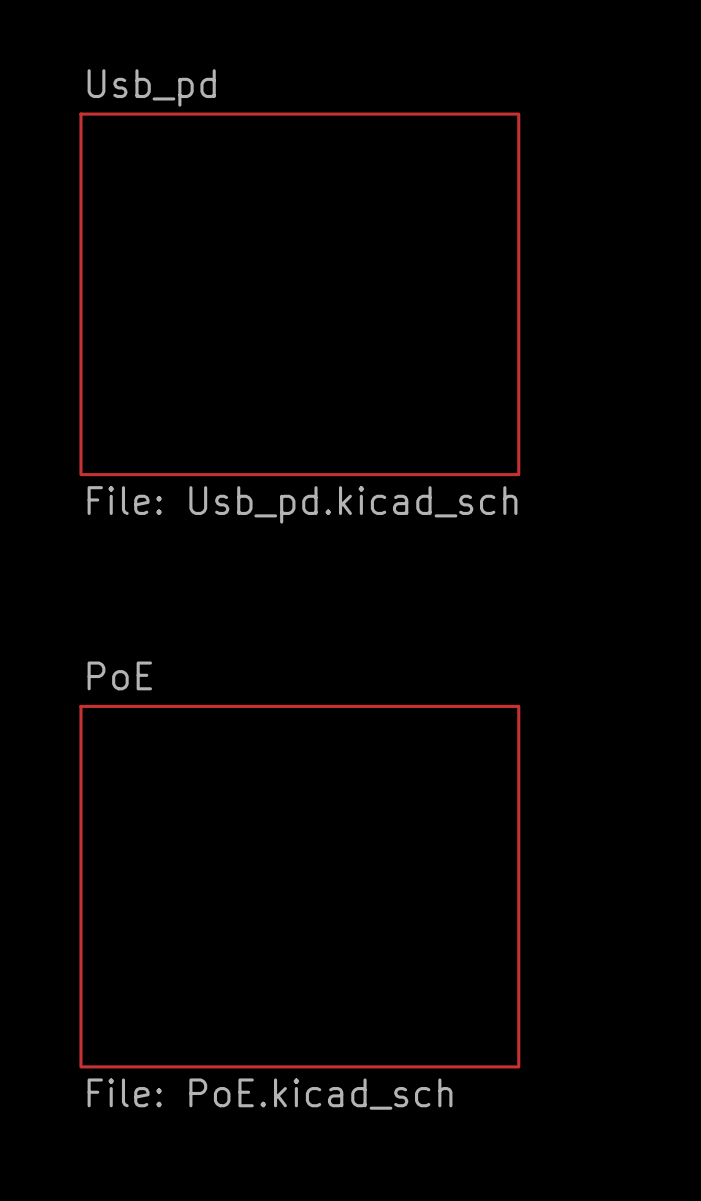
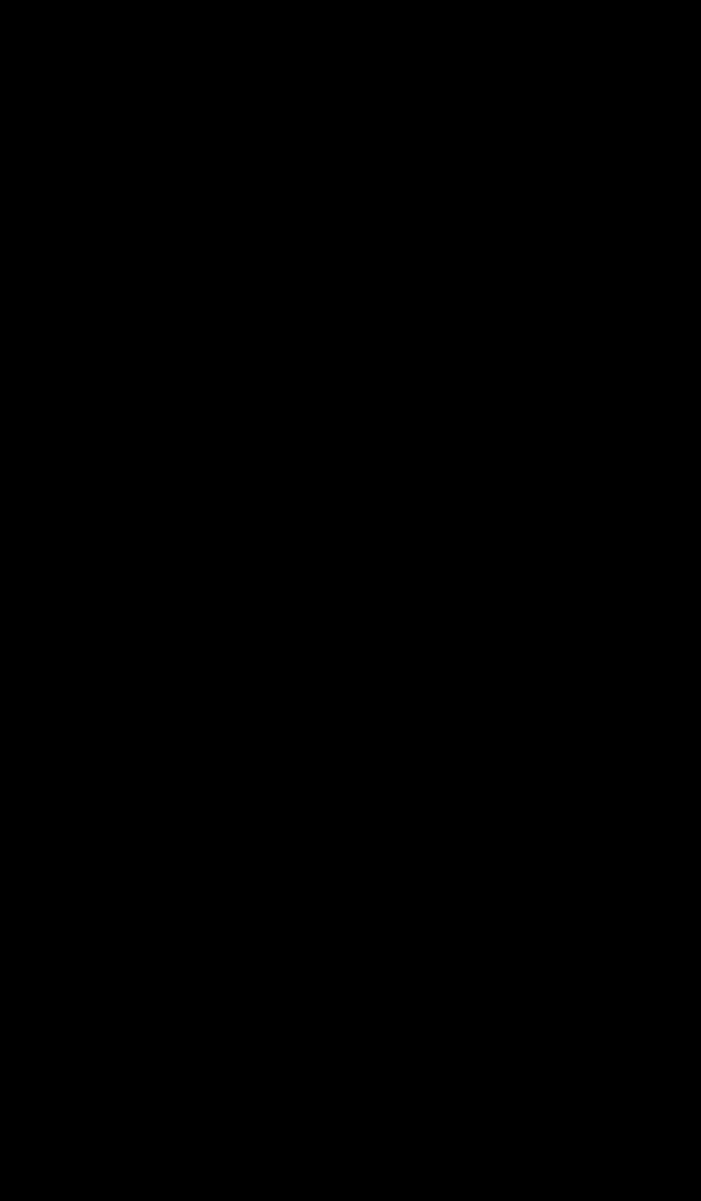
sheet Usb_pd: File: Usb_pd.kicad_sch (299, 294) -> none
sheet PoE: File: PoE.kicad_sch (299, 886) -> none

